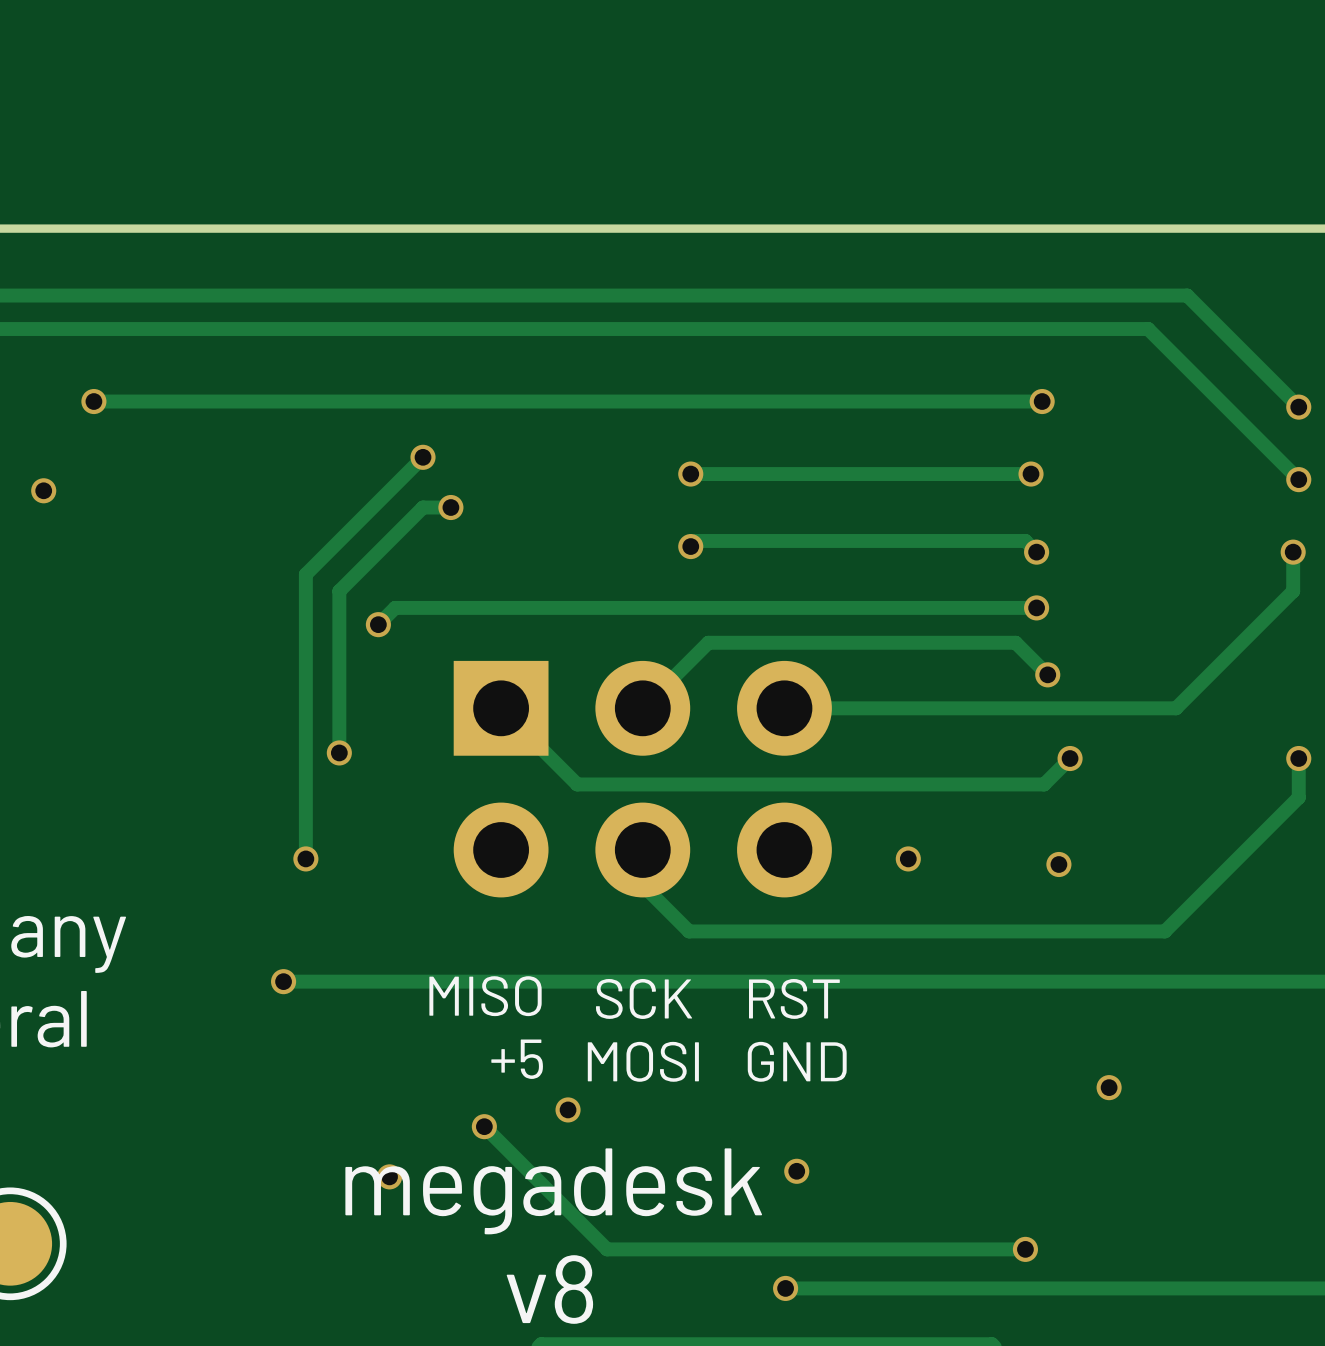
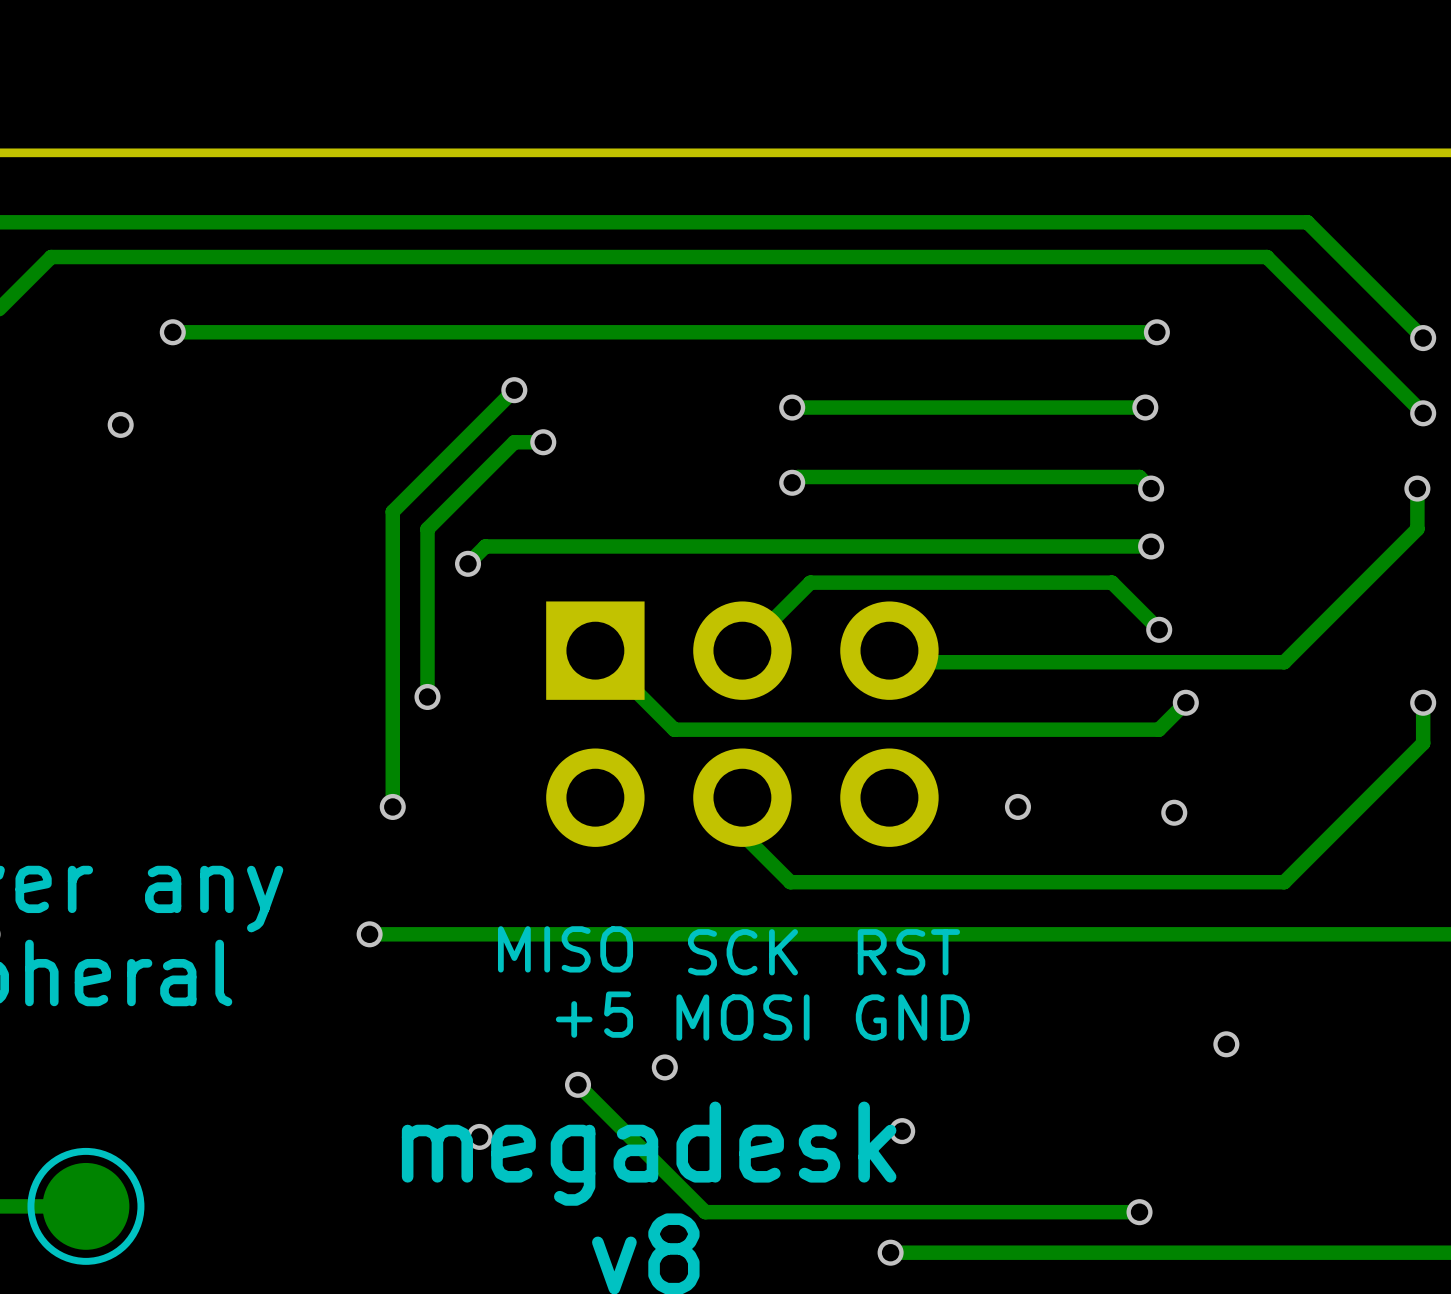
track: (998, 642) (1015, 642) (1047, 674) -> (1112, 582) (1159, 629)
via position: (1047, 674) -> (1159, 629)
track: (1176, 708) (784, 708) -> (1295, 650) (1284, 662) (901, 662)

